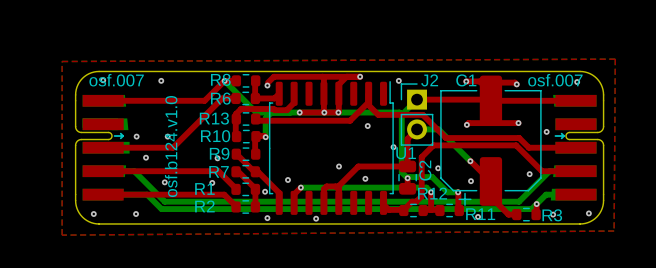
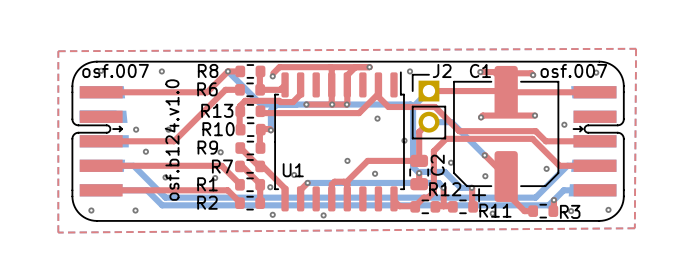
R8 name position: R8 (220, 79) -> R8 (208, 70)
R6 name position: R6 (220, 98) -> R6 (207, 89)
R9 name position: R9 (219, 153) -> R9 (207, 147)
U1 name position: U1 (406, 153) -> U1 (293, 170)

